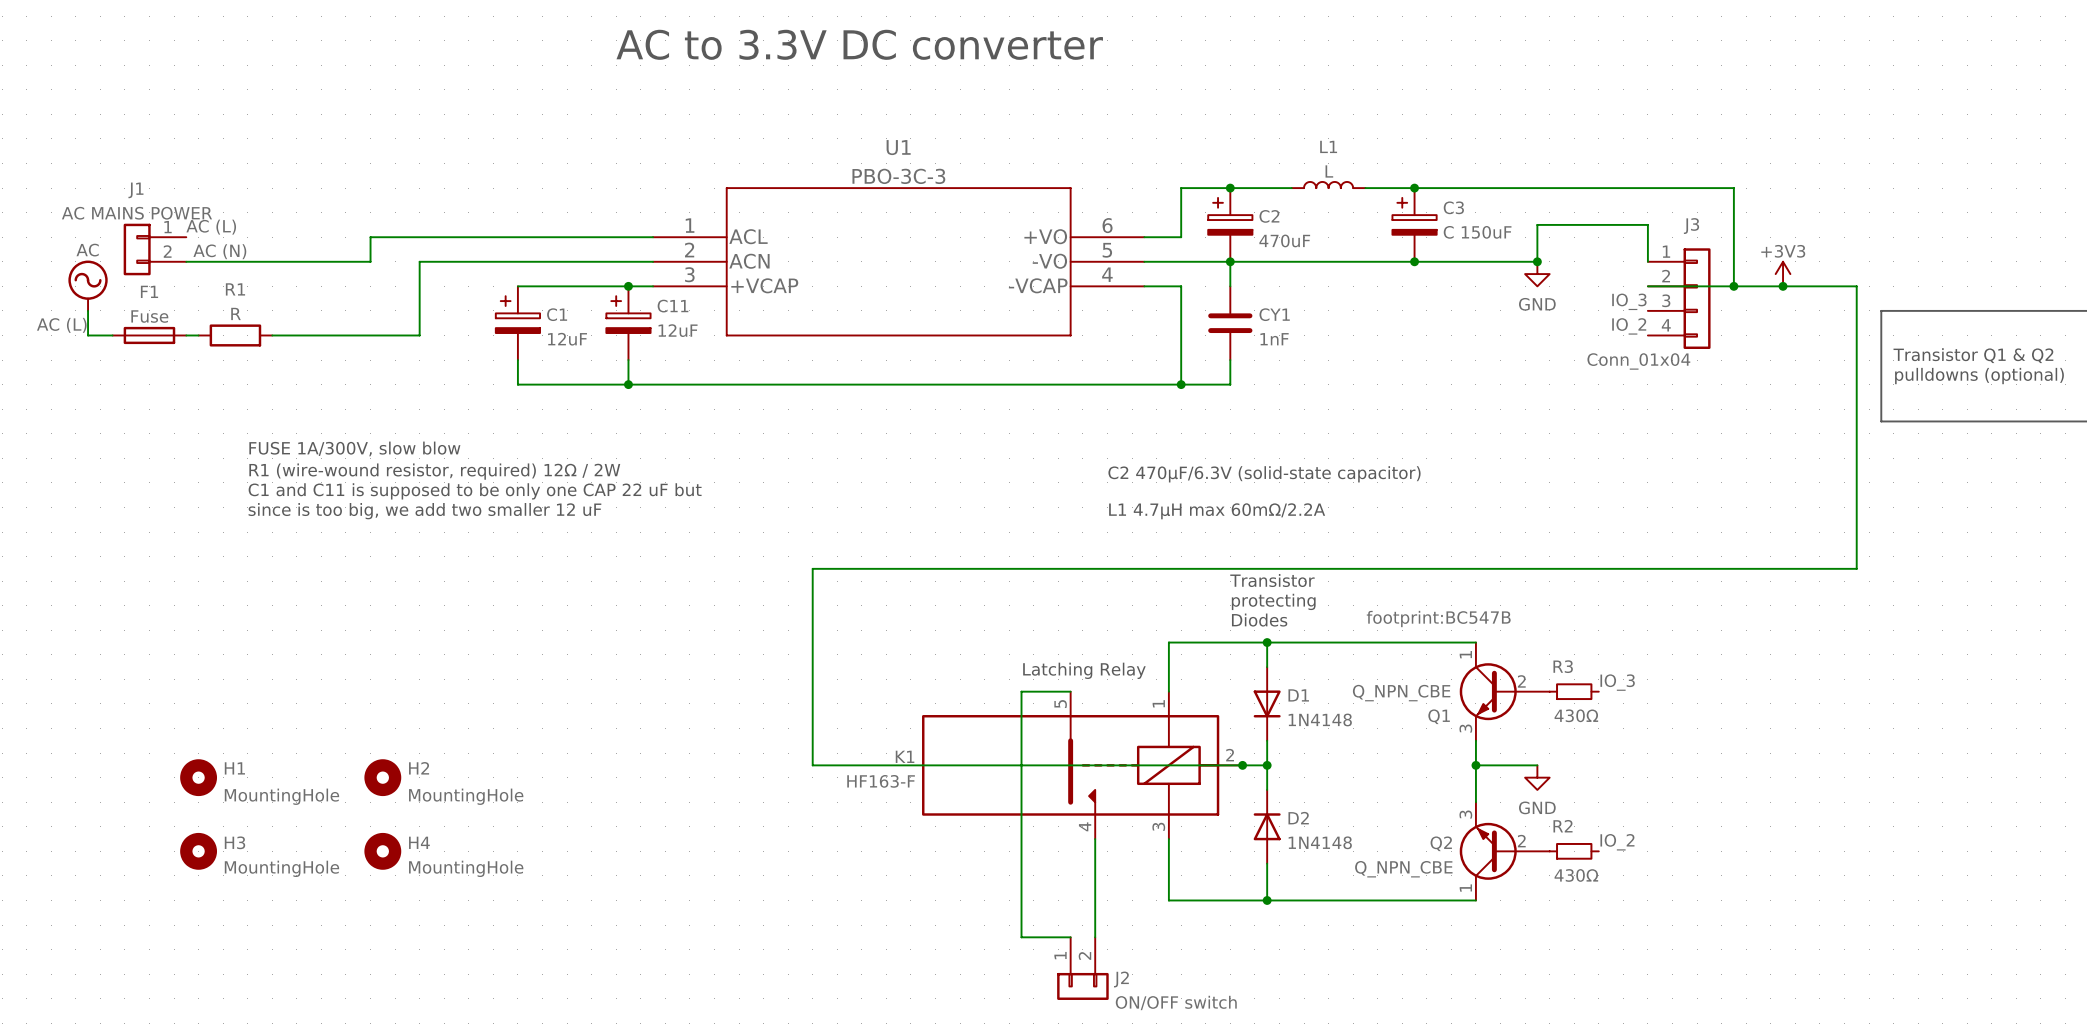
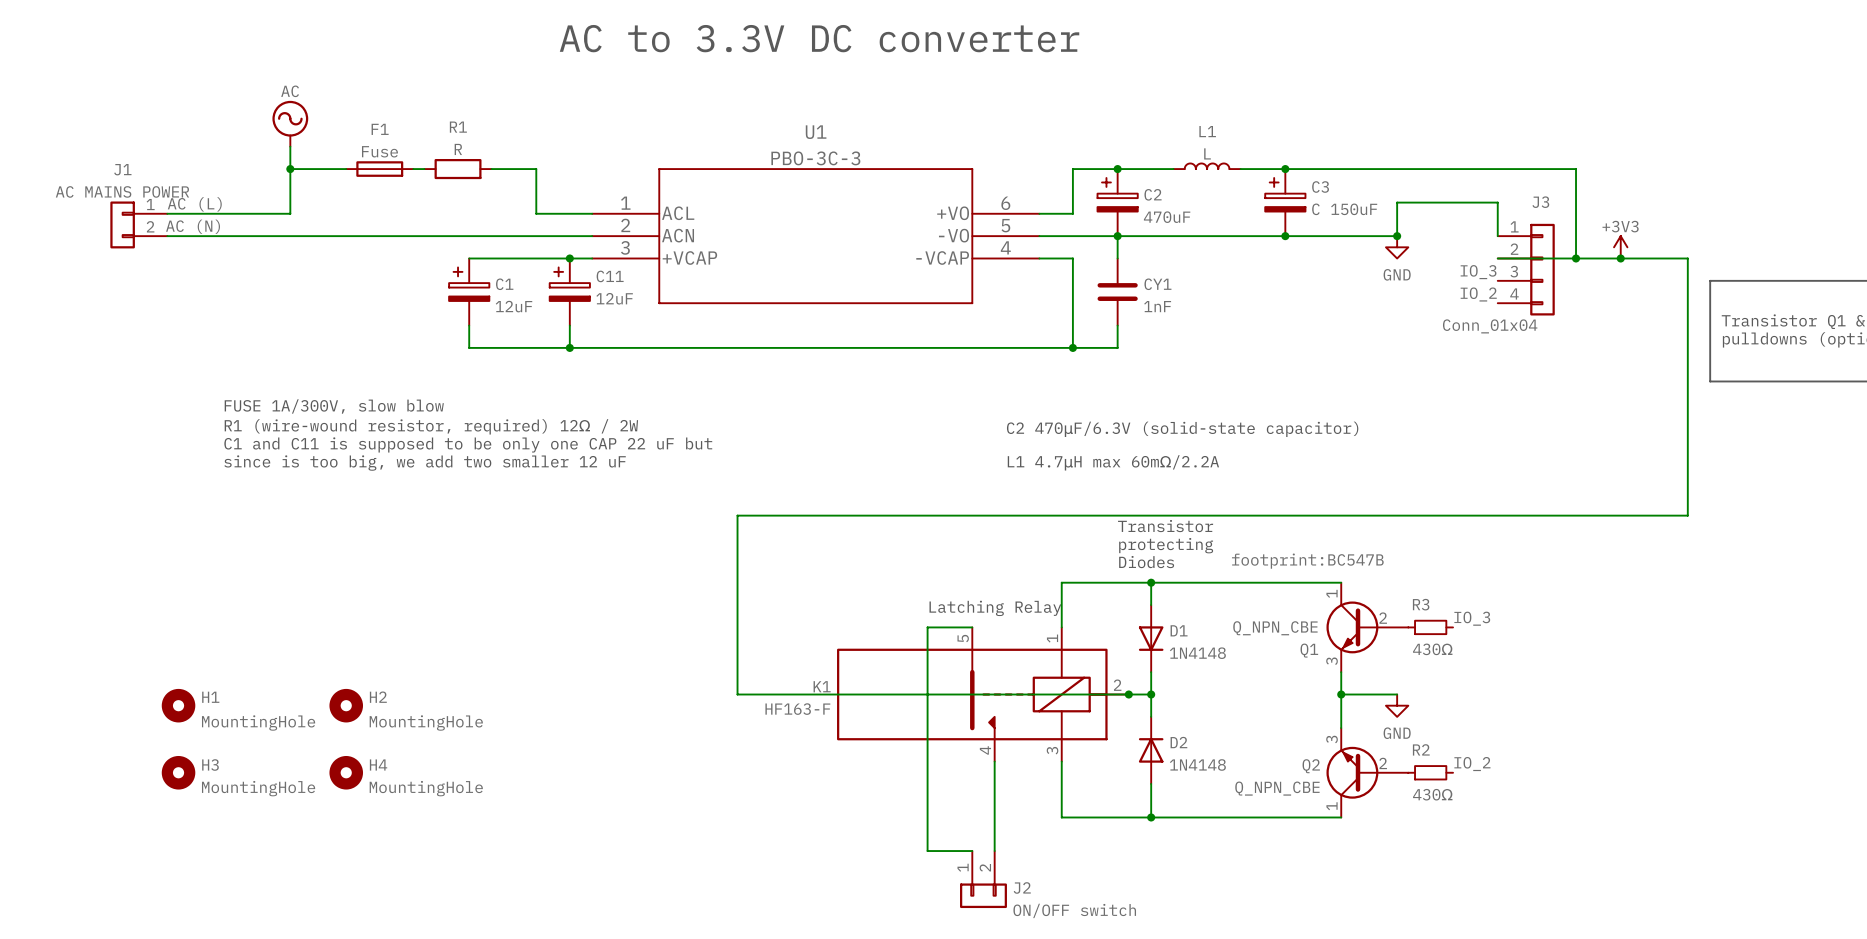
power symbol: none -> AC (290, 123)
wire: none -> (290, 146) (290, 213) (167, 213)
wire: none -> (290, 169) (346, 169)
junction: none -> (290, 169)
wire: none -> (413, 169) (424, 169)
wire: (591, 237) (370, 237) (370, 261) -> (536, 213) (536, 169) (491, 169)
wire: (419, 261) (419, 335) (272, 335) -> (379, 236) (335, 236)
power symbol: AC (88, 285) -> none
wire: (88, 310) (88, 335) (112, 335) -> none
label: AC (L) (61, 325) -> none
F1 position: (149, 335) -> (379, 169)
wire: (186, 335) (198, 335) -> none
R1 position: (235, 335) -> (458, 169)

